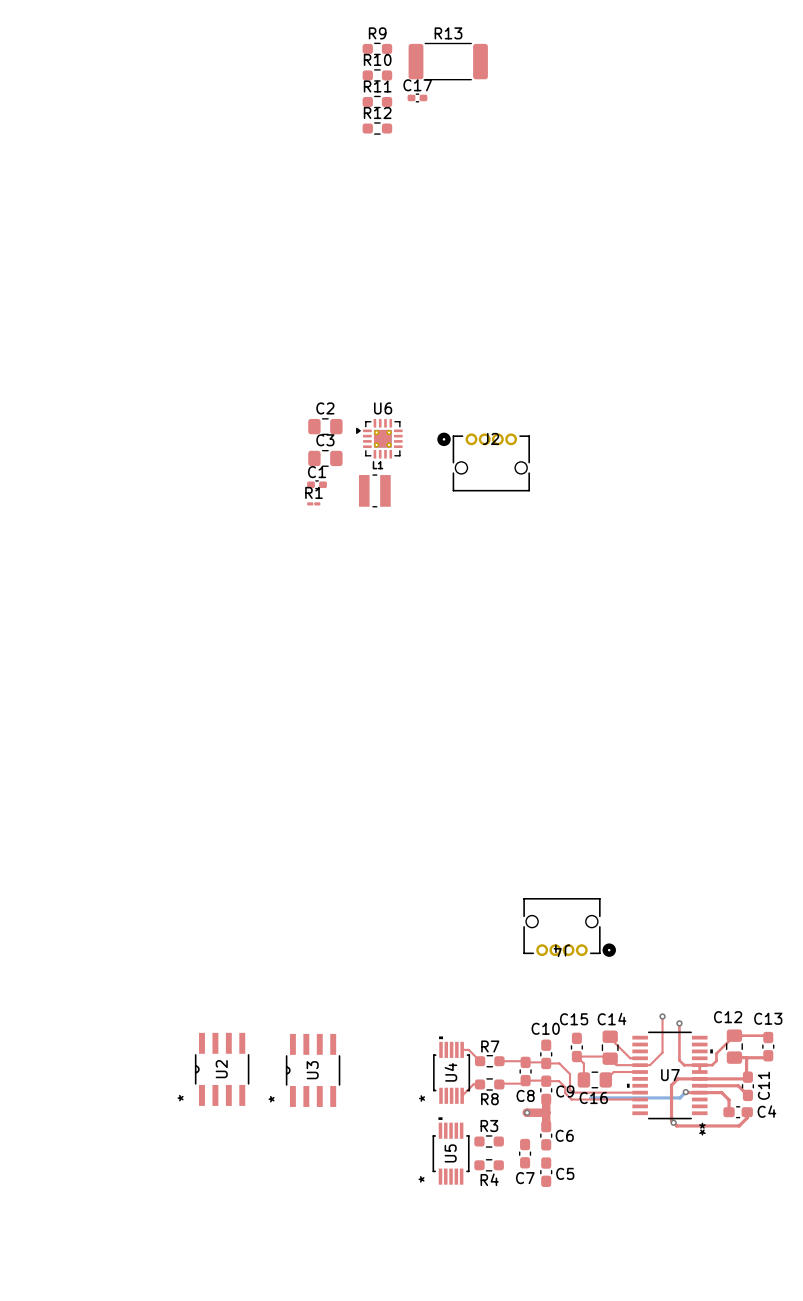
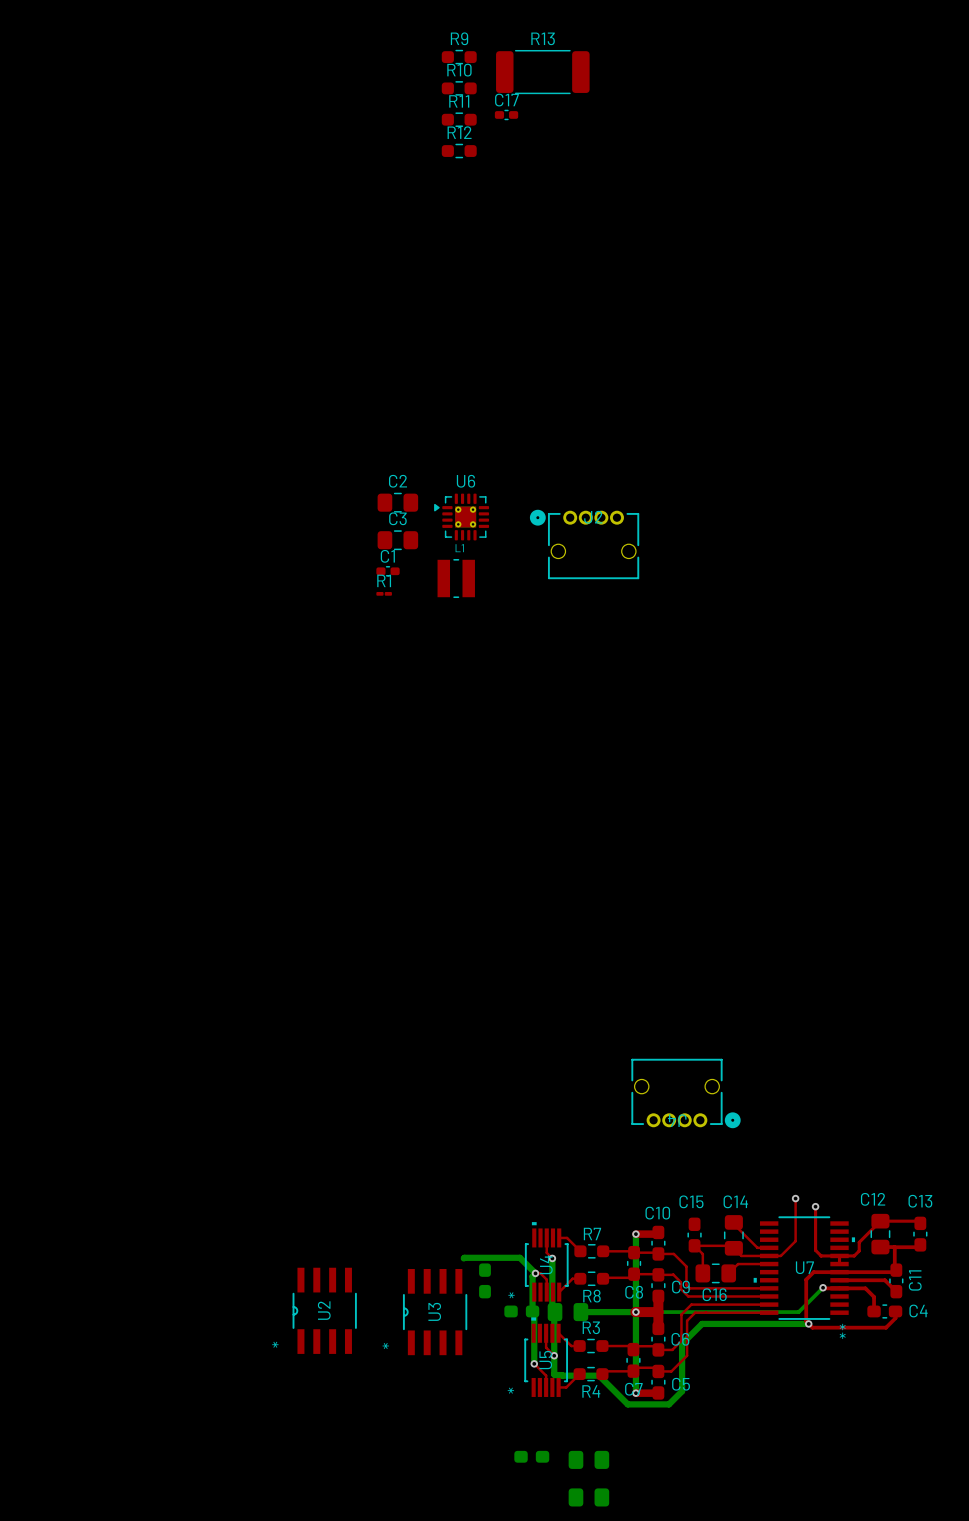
top track: none -> (658, 1232) (656, 1234) (635, 1234)
bottom track: none -> (635, 1234) (635, 1393)
via: none -> (635, 1234)
top track: none -> (546, 1237) (546, 1252) (552, 1258)
bottom track: none -> (463, 1258) (519, 1257) (535, 1273) (532, 1276) (534, 1363)
bottom track: none -> (552, 1258) (552, 1309) (555, 1312) (554, 1374) (599, 1375) (627, 1404) (669, 1404) (682, 1391) (682, 1343) (702, 1323) (808, 1323)
via: none -> (552, 1258)
U2 position: (222, 1069) -> (324, 1310)
U3 position: (313, 1070) -> (435, 1312)
top track: none -> (535, 1273) (540, 1273) (546, 1279) (546, 1292)
via: none -> (535, 1273)
part: none -> (485, 1280)
bottom track: (590, 1097) (679, 1097) -> (580, 1312) (798, 1312) (816, 1294)
top track: none -> (769, 1304) (691, 1304) (681, 1314) (681, 1340) (672, 1349) (658, 1349) (654, 1346) (602, 1346)
part: none -> (521, 1311)
part: none -> (567, 1312)
top track: none -> (769, 1312) (695, 1312) (687, 1320) (687, 1355) (671, 1371) (658, 1371) (654, 1367) (633, 1367) (629, 1371) (605, 1371) (602, 1374)
top track: none -> (546, 1333) (546, 1347) (554, 1355)
top track: none -> (558, 1333) (571, 1346) (579, 1346)
via: none -> (554, 1355)
top track: none -> (534, 1363) (546, 1375) (546, 1387)
via: none -> (534, 1363)
top track: none -> (579, 1374) (566, 1387) (558, 1387)
via: none -> (635, 1393)
top track: none -> (658, 1392) (635, 1393)
part: none -> (531, 1456)
part: none -> (588, 1459)
part: none -> (588, 1497)

